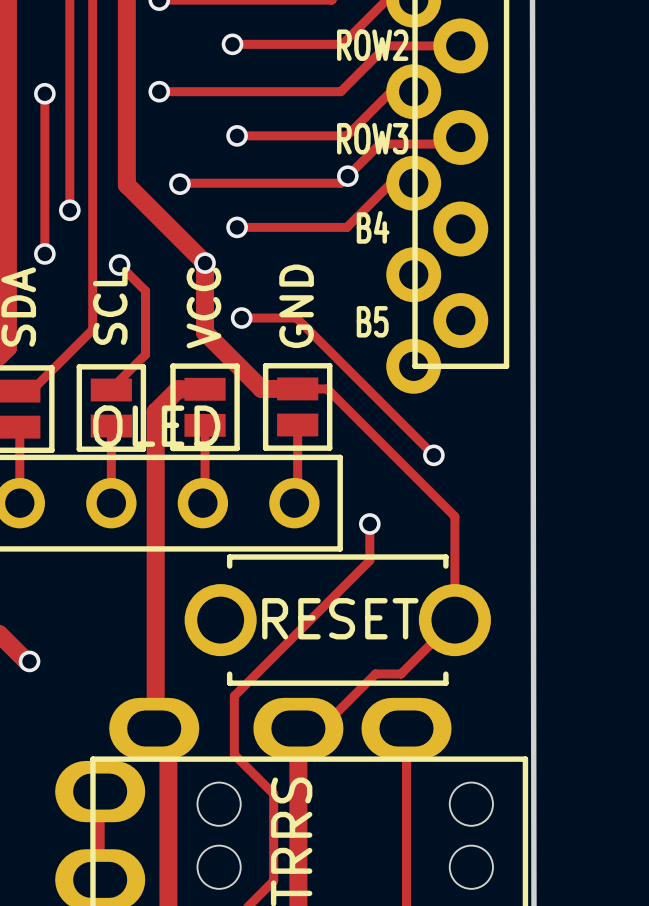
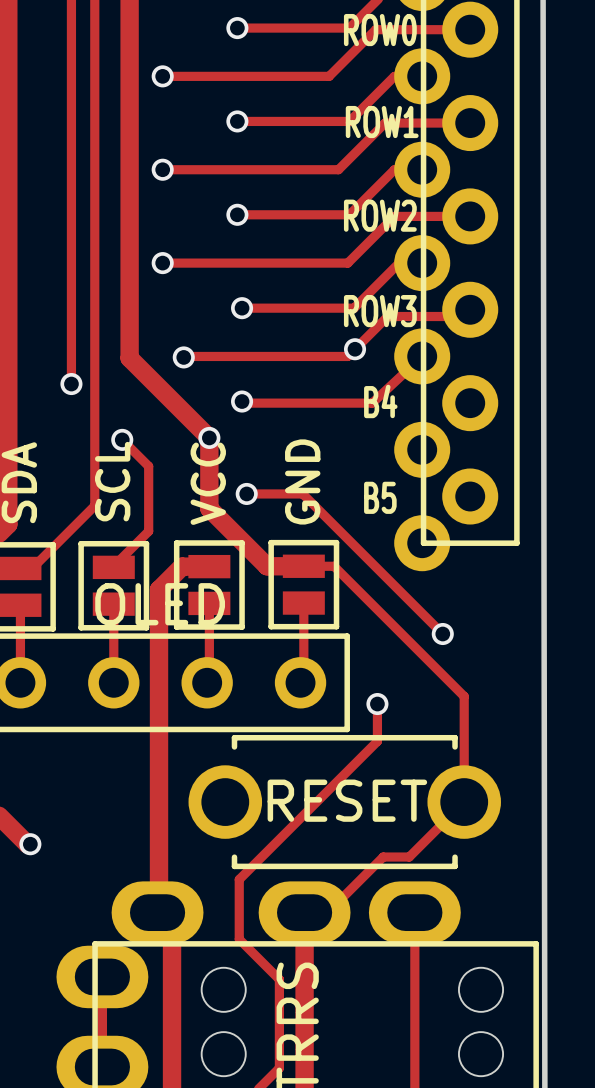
track: (44, 93) (44, 253) -> none
via: (44, 93) -> none
track: (391, 183) (346, 227) (237, 227) -> none
track: none -> (422, 356) (372, 403) (243, 403)
via: (44, 253) -> none

